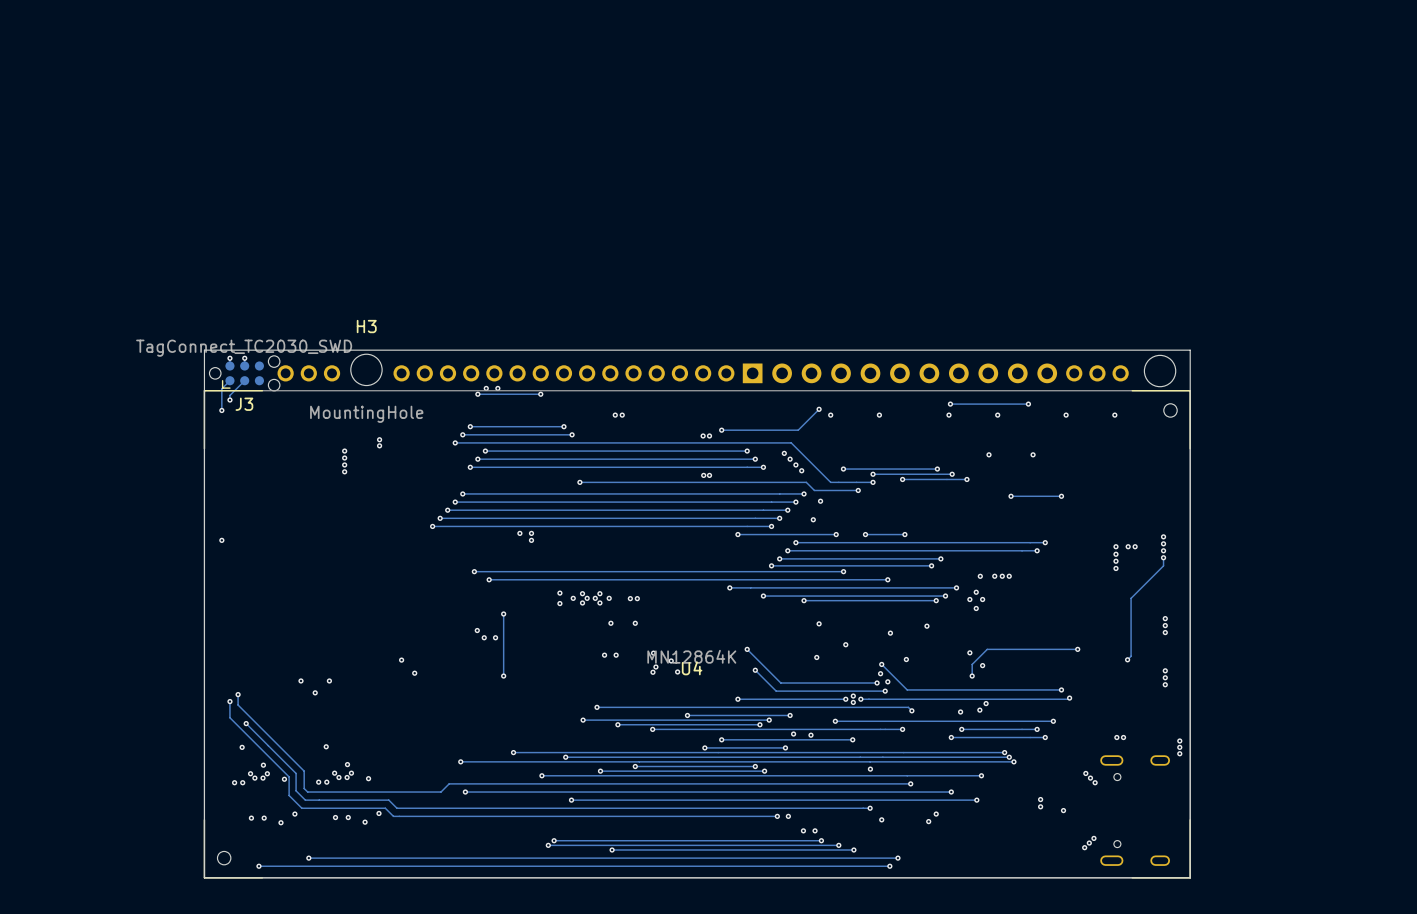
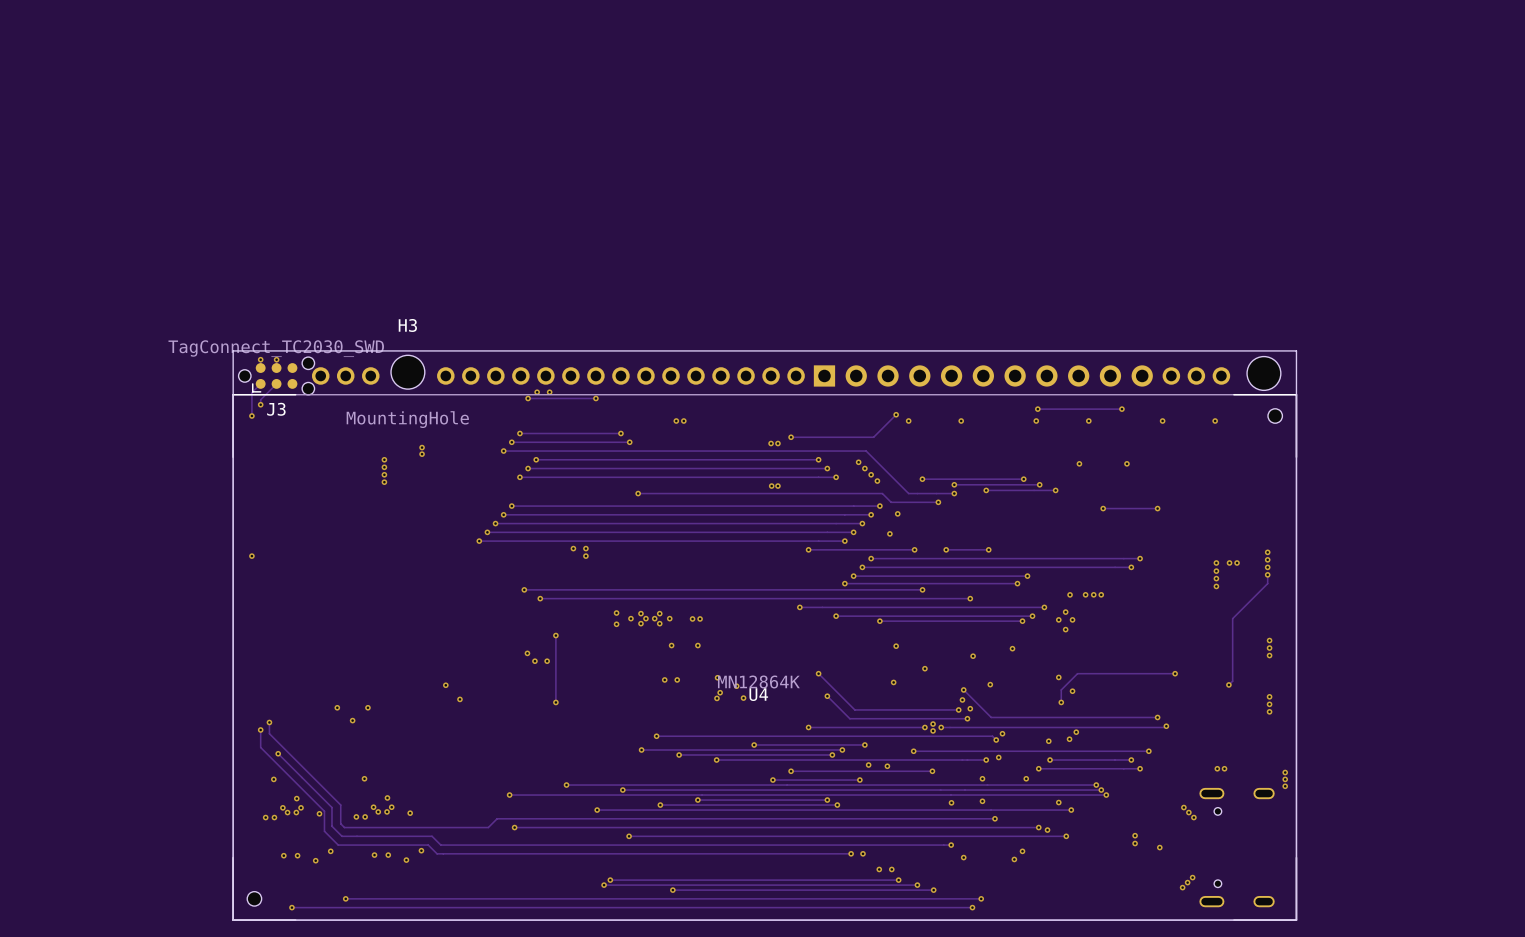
via: none -> (1002, 733)
via: none -> (998, 757)
via: none -> (982, 778)
via: none -> (1026, 778)
via: none -> (982, 801)
via: none -> (1058, 802)
via: none -> (1047, 830)

